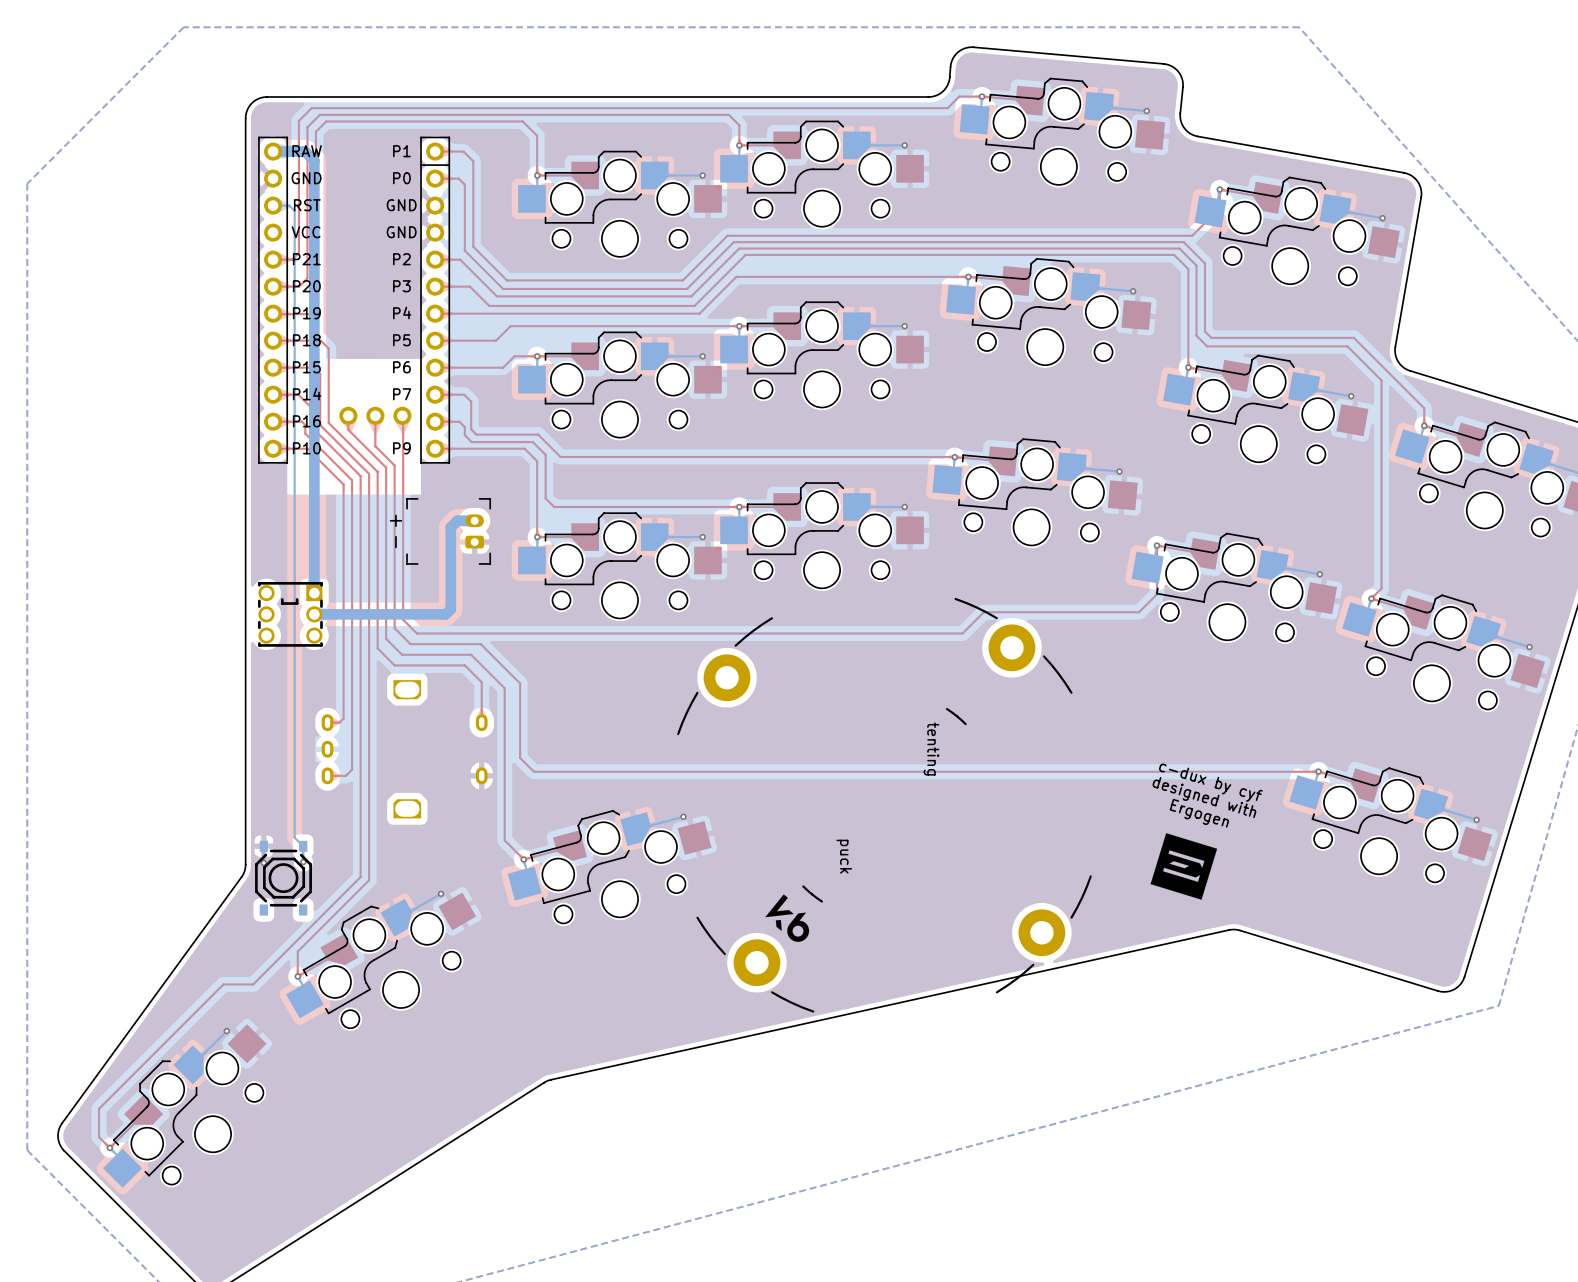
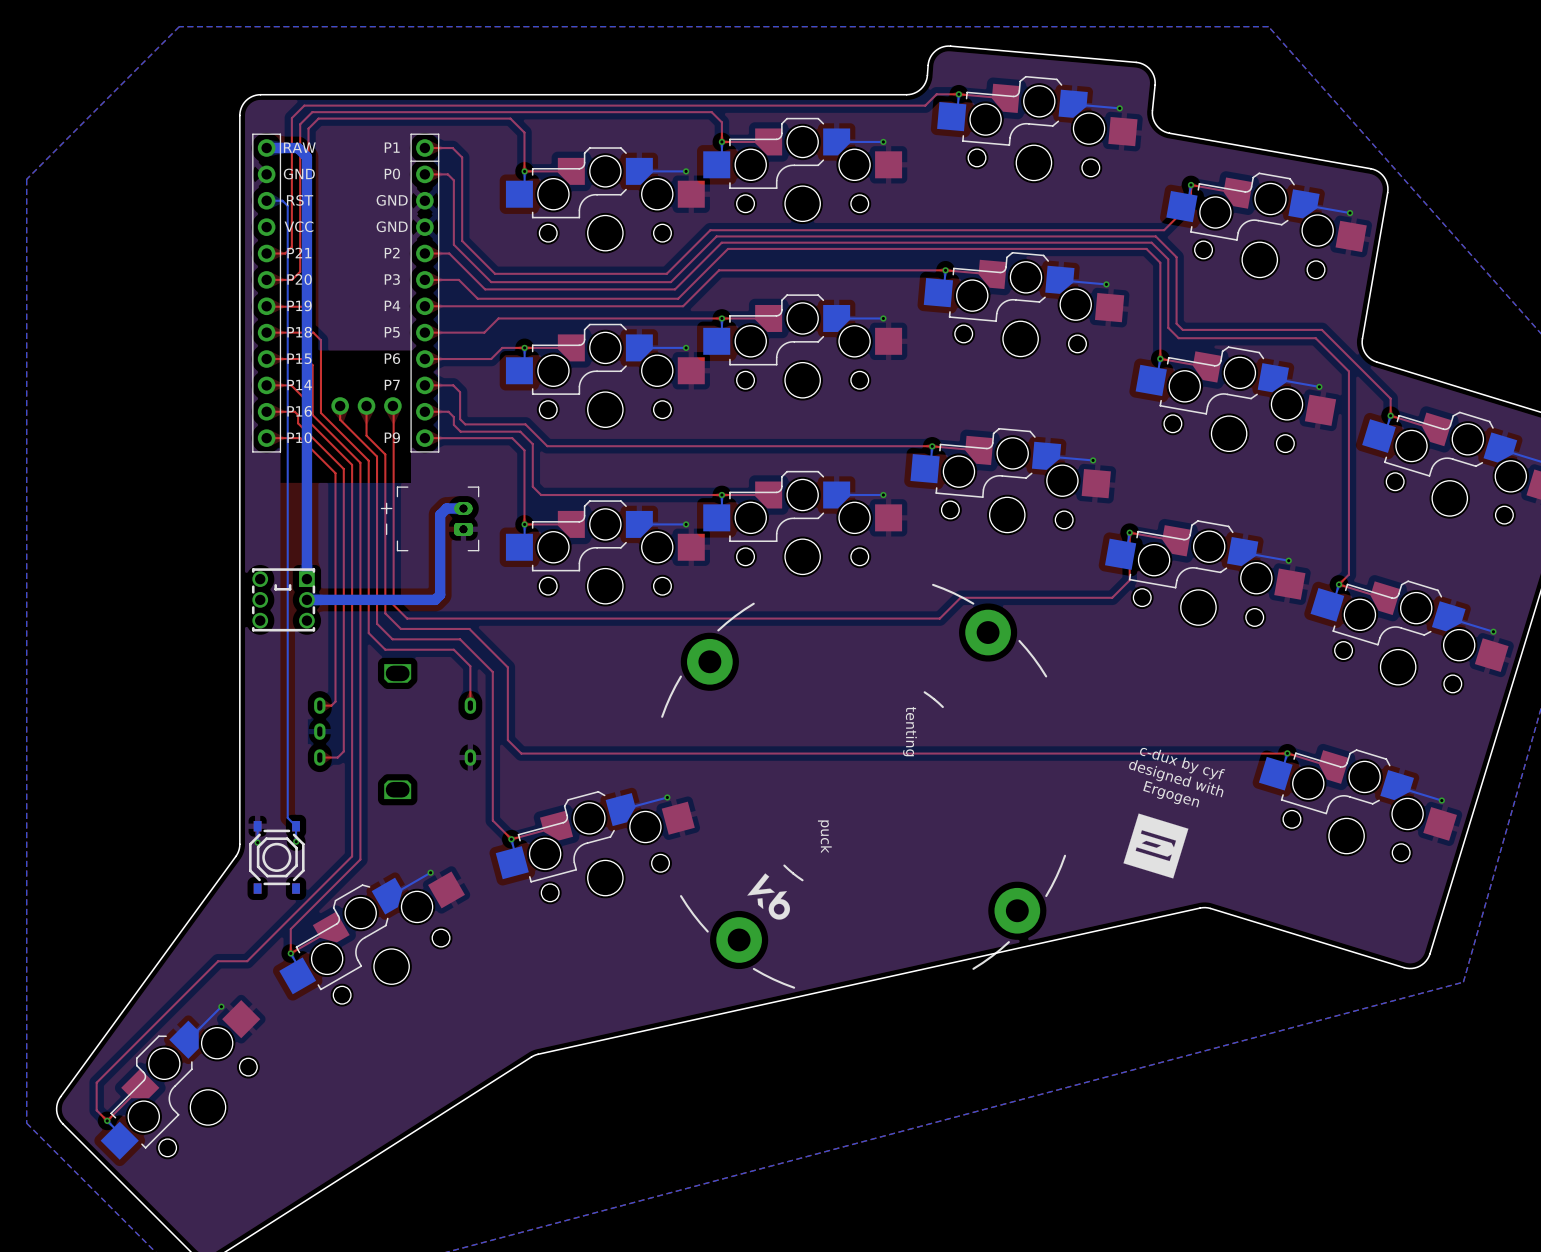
part: none -> (463, 518)

